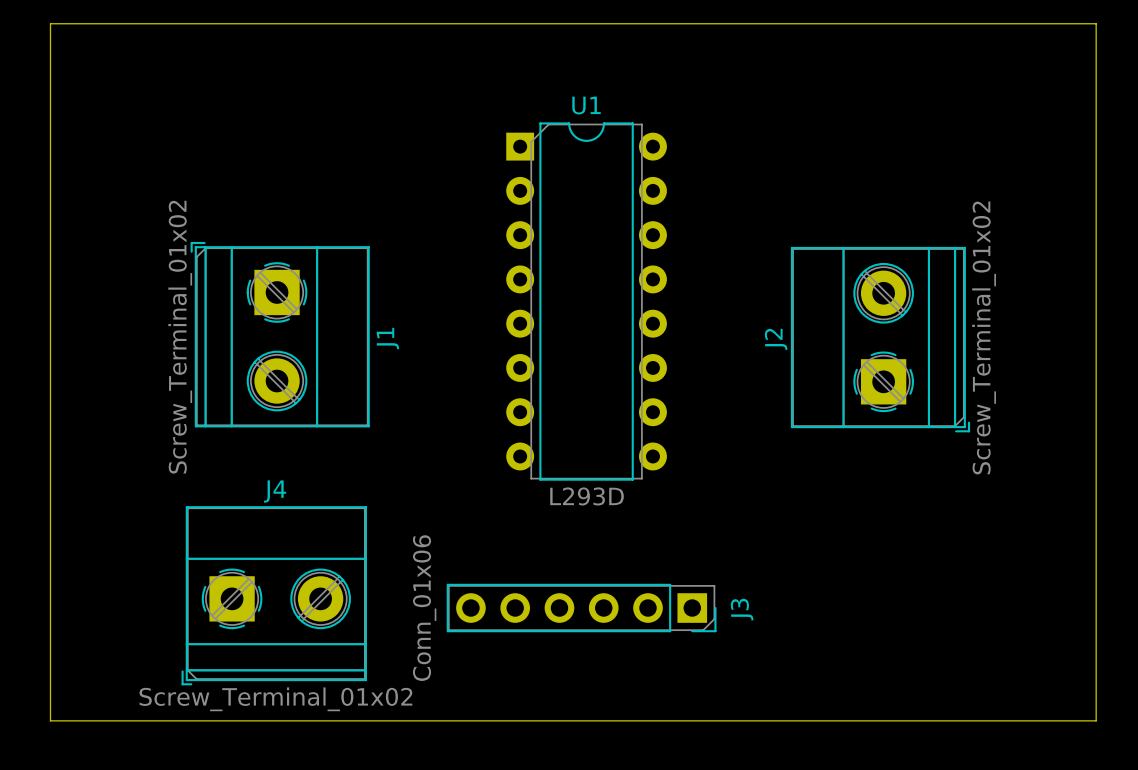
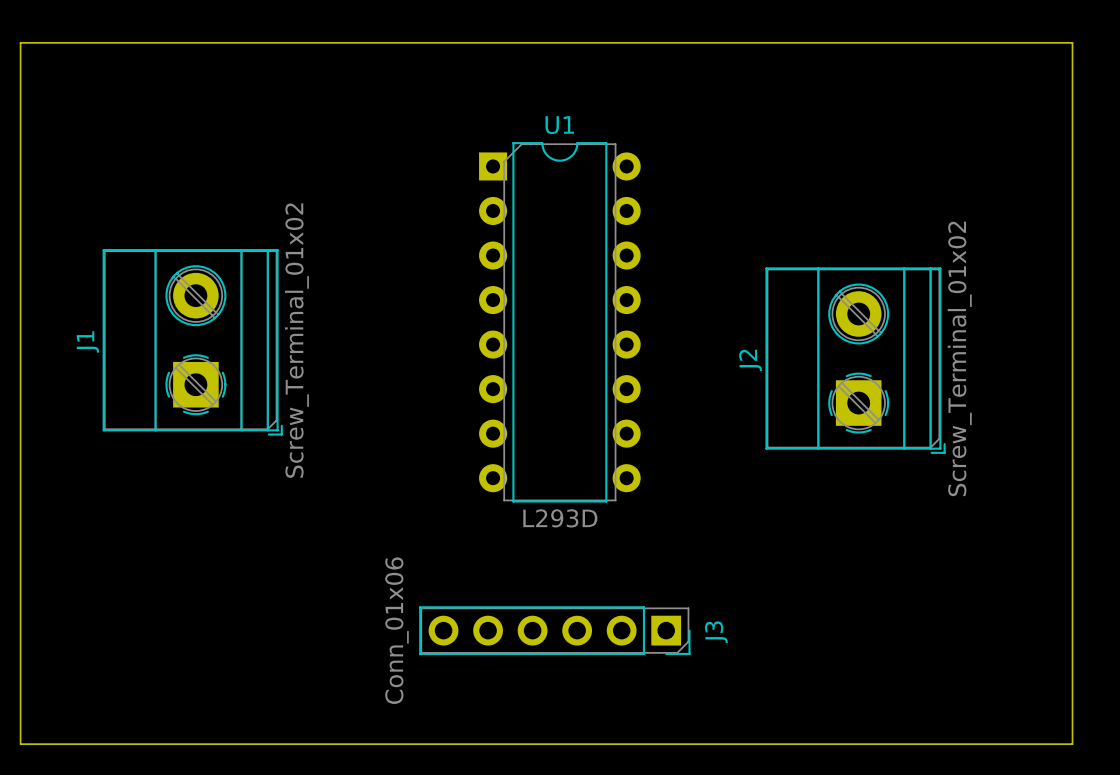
J1 rotation: 0° (280, 334) -> 180° (192, 342)
J4: Screw_Terminal_01x02 (274, 595) -> none

